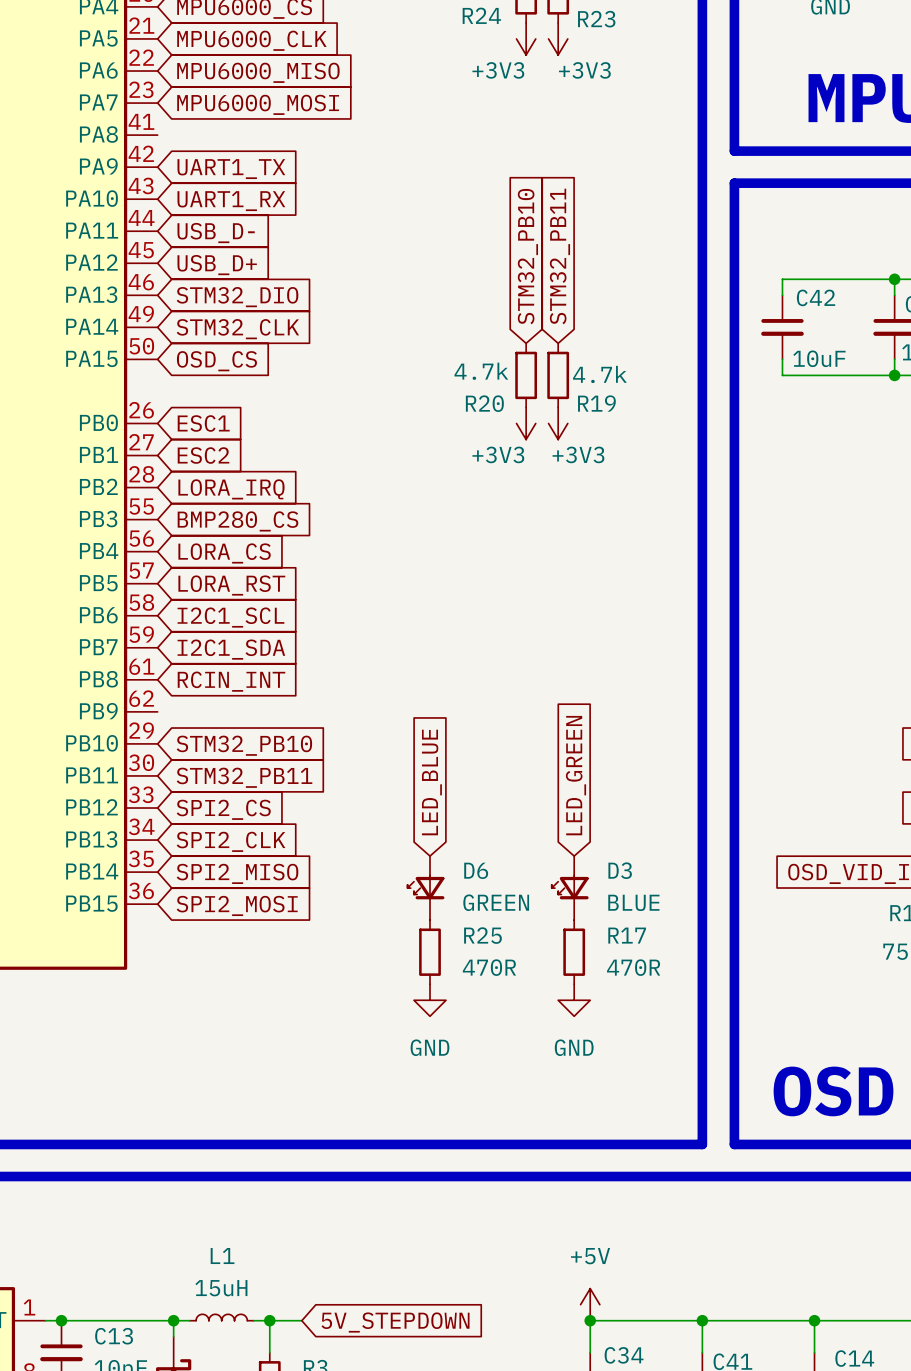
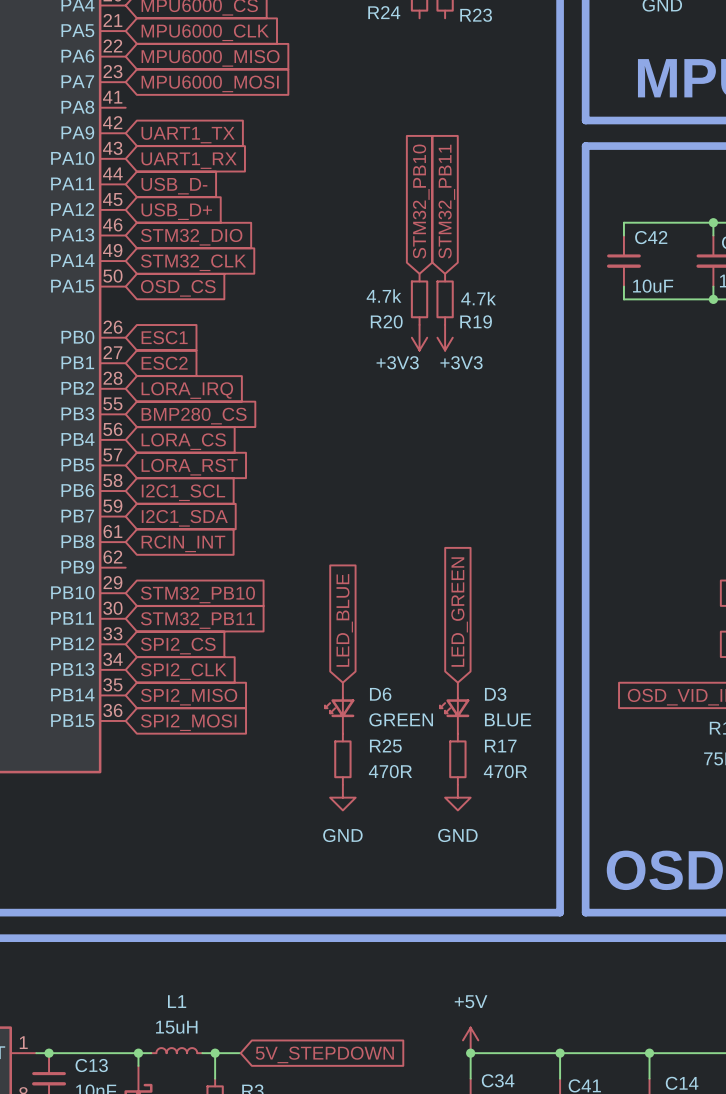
power symbol: +3V3 (526, 38) -> none
power symbol: +3V3 (558, 38) -> none

